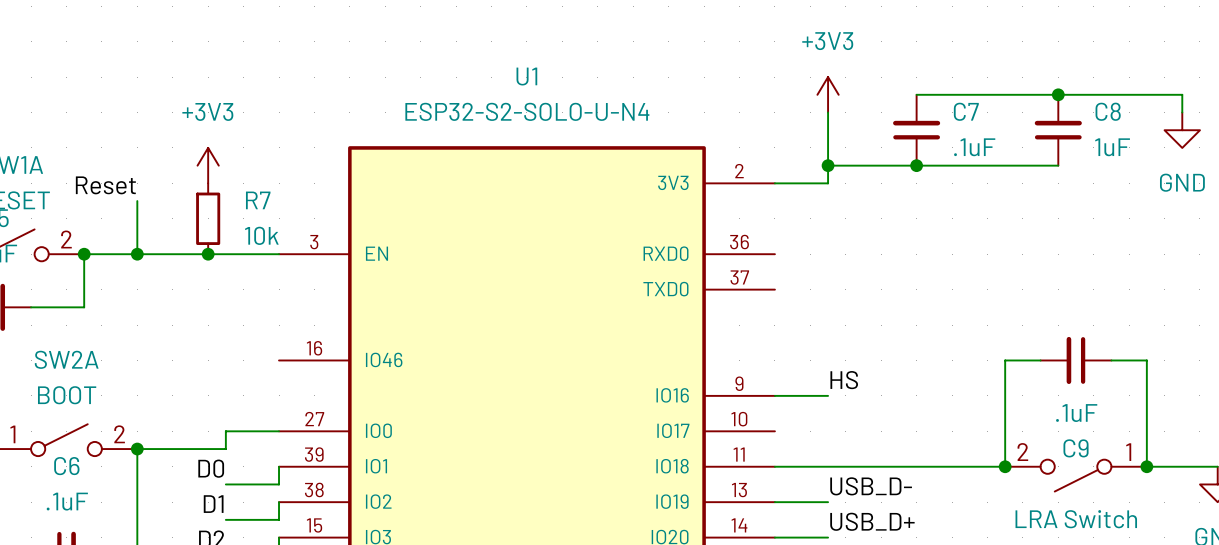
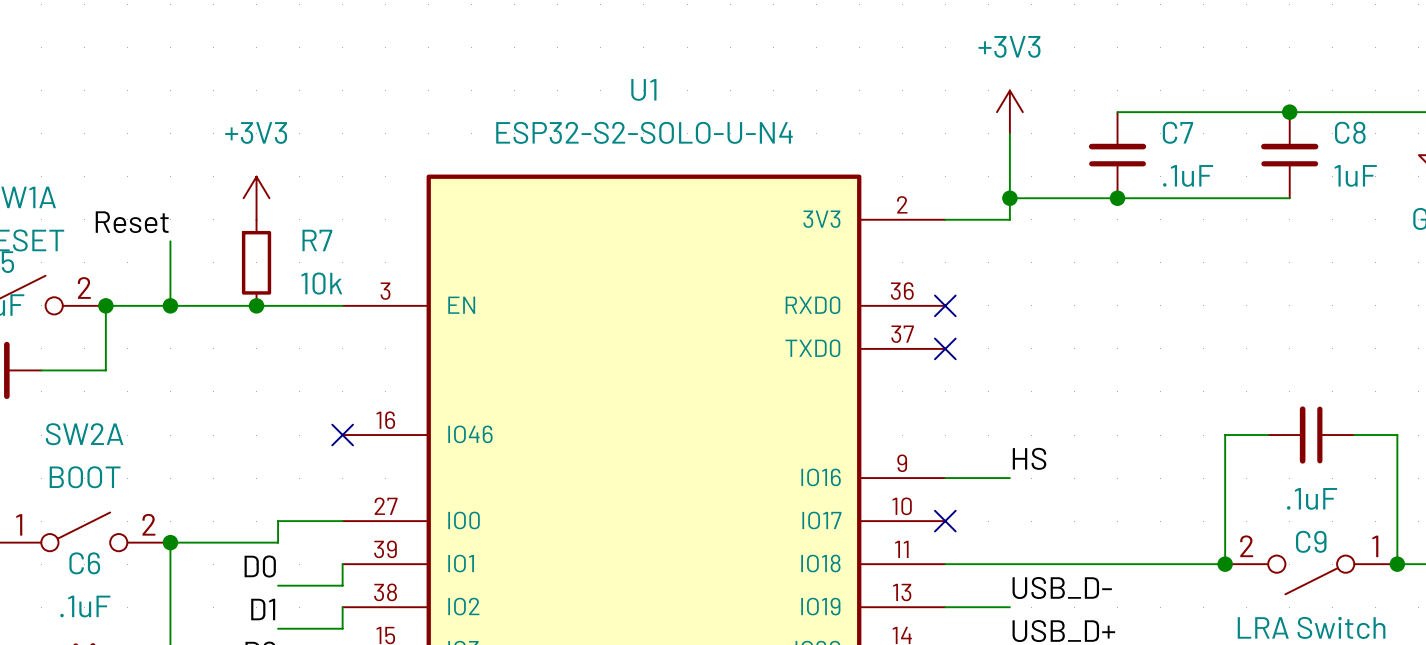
no-connect mark: none -> (945, 305)
no-connect mark: none -> (945, 348)
no-connect mark: none -> (342, 435)
no-connect mark: none -> (945, 521)

